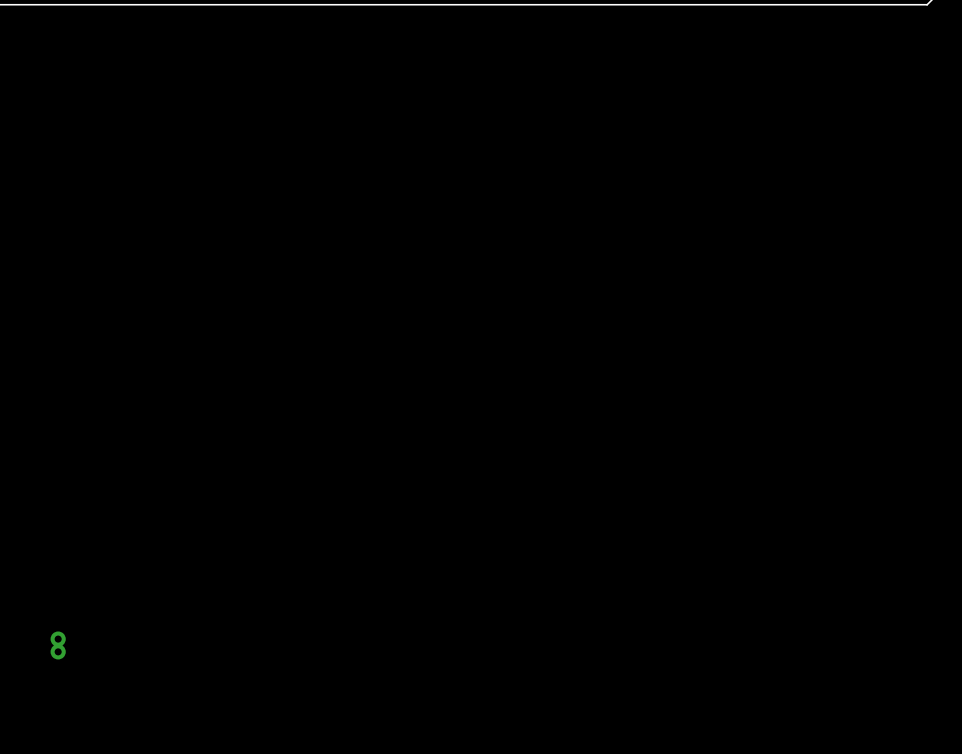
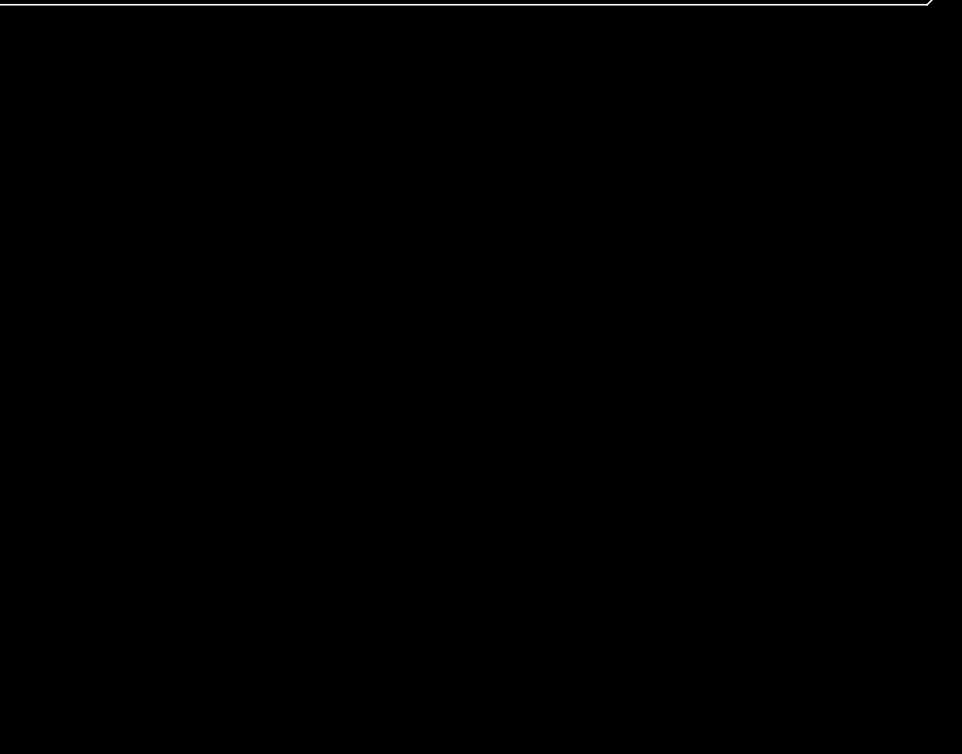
via: (58, 639) -> none
via: (58, 651) -> none

